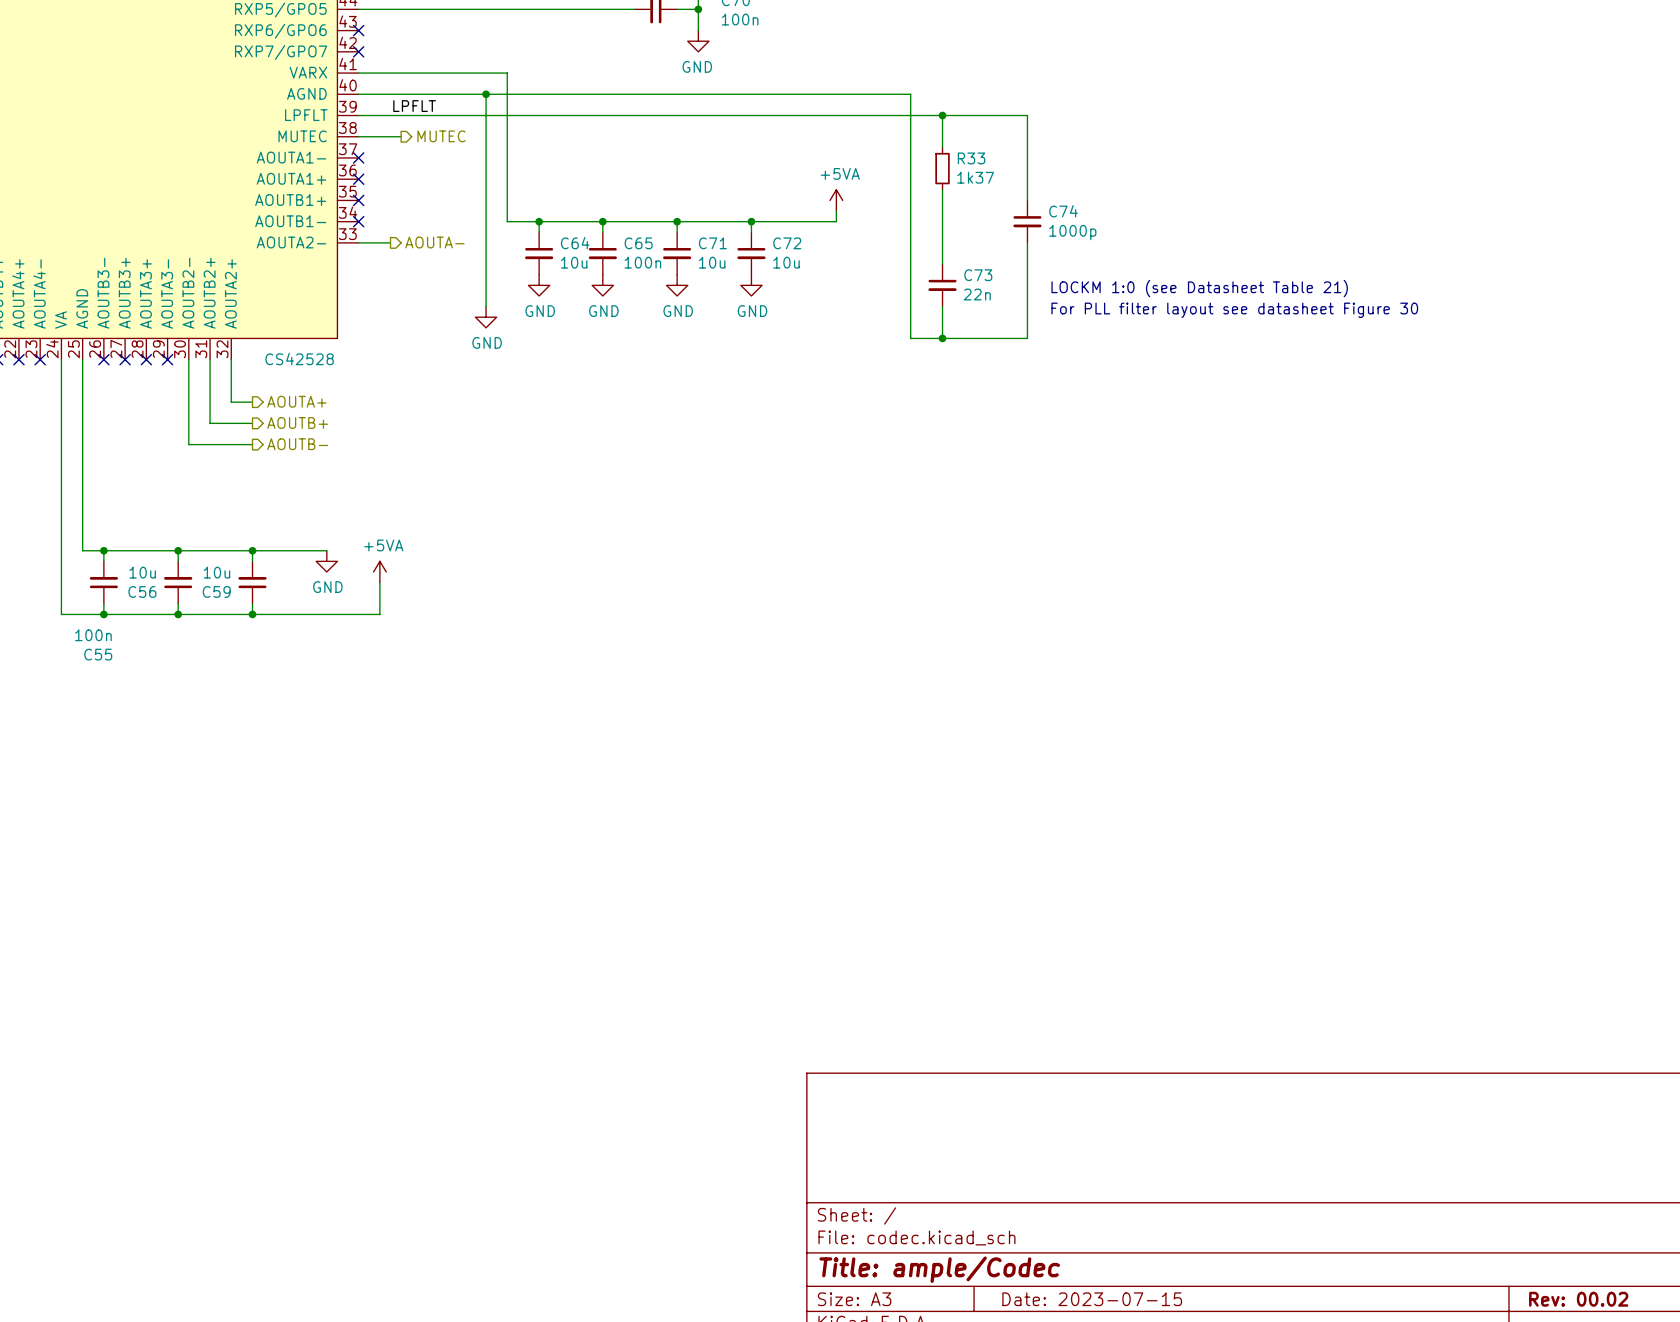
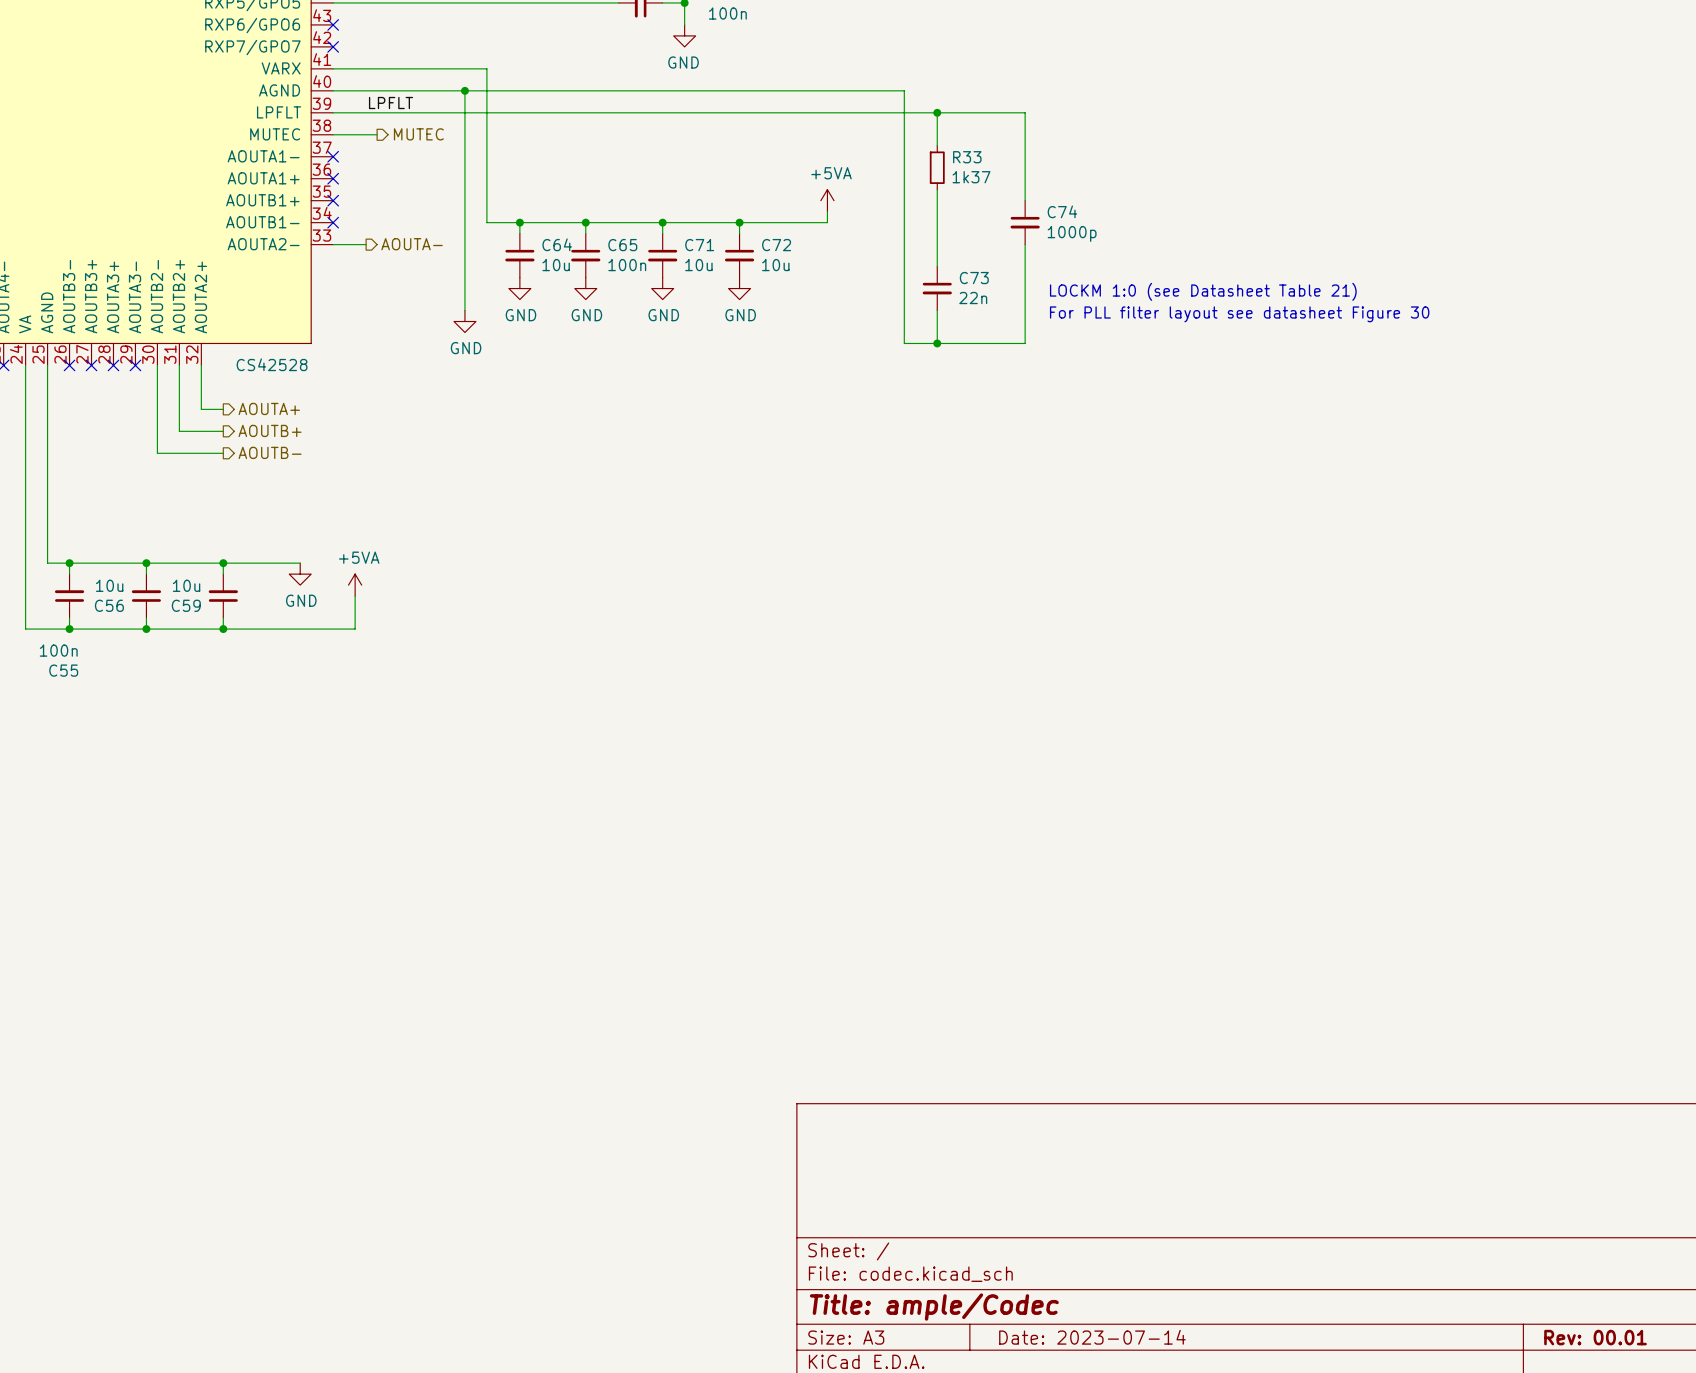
title block: Date: 2023-07-15 (1092, 1299) -> Date: 2023-07-14 (1092, 1337)
title block: Rev: 00.02 (1578, 1299) -> Rev: 00.01 (1595, 1337)

